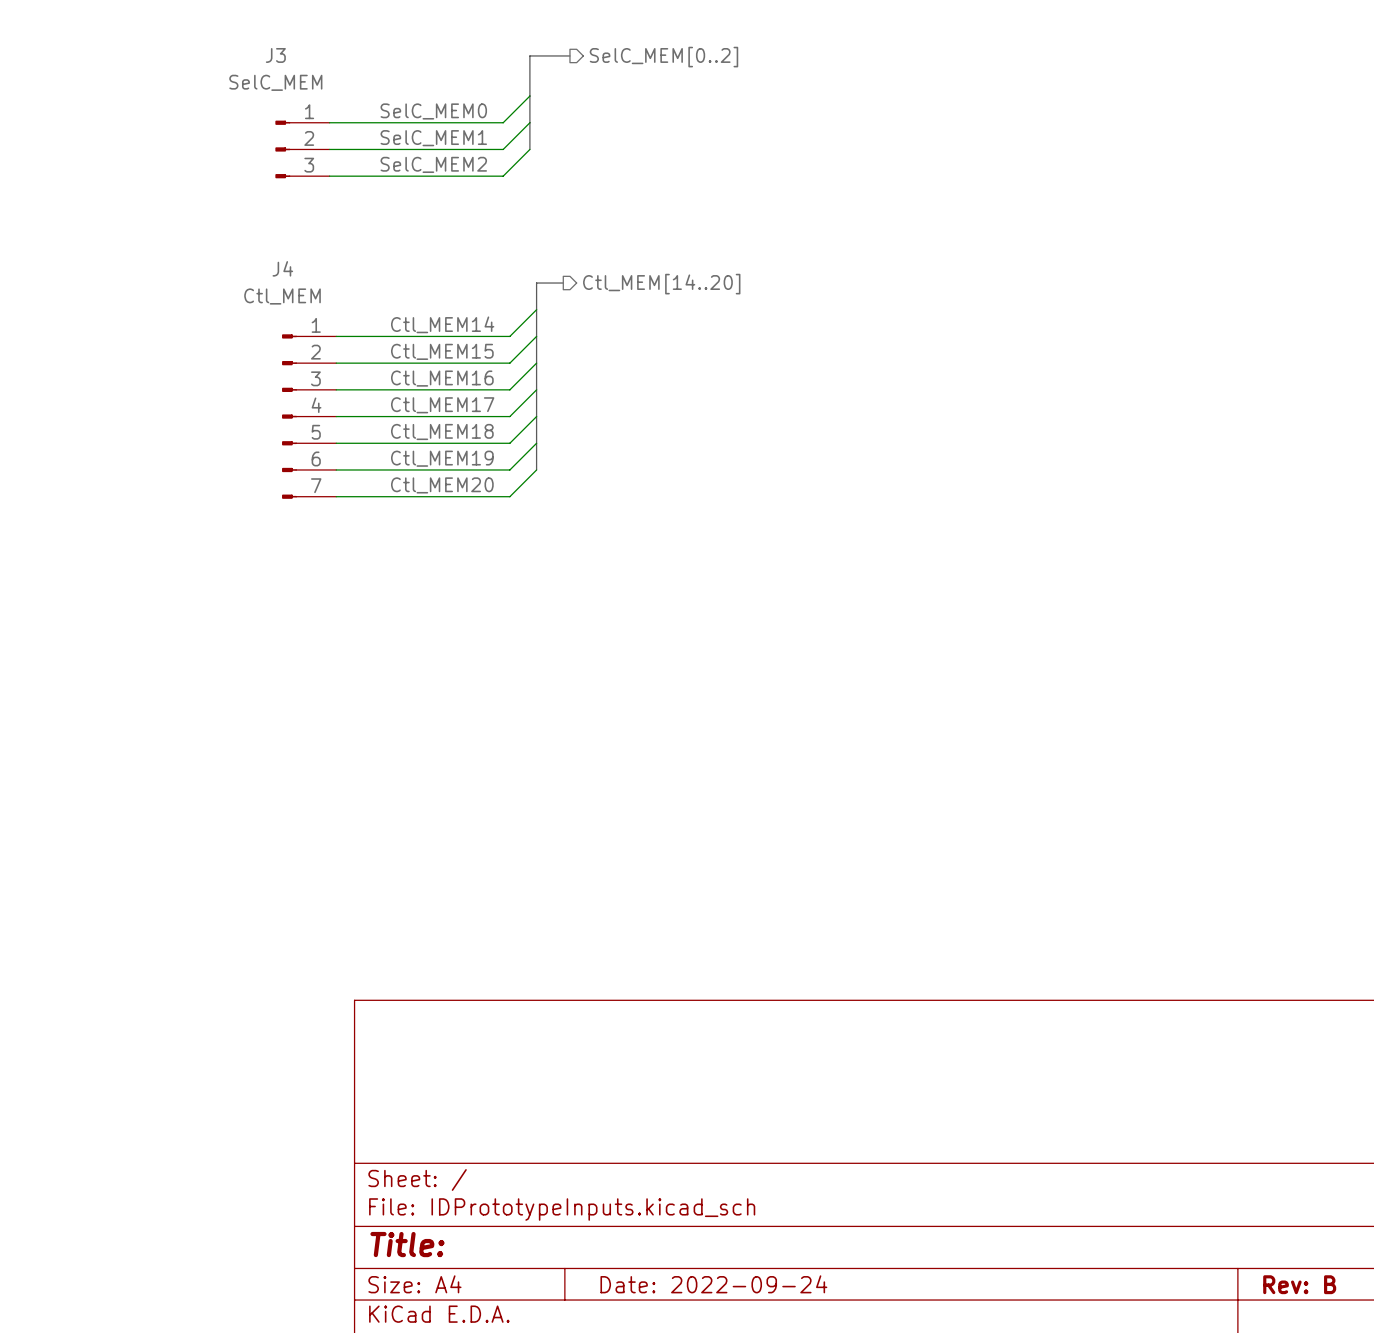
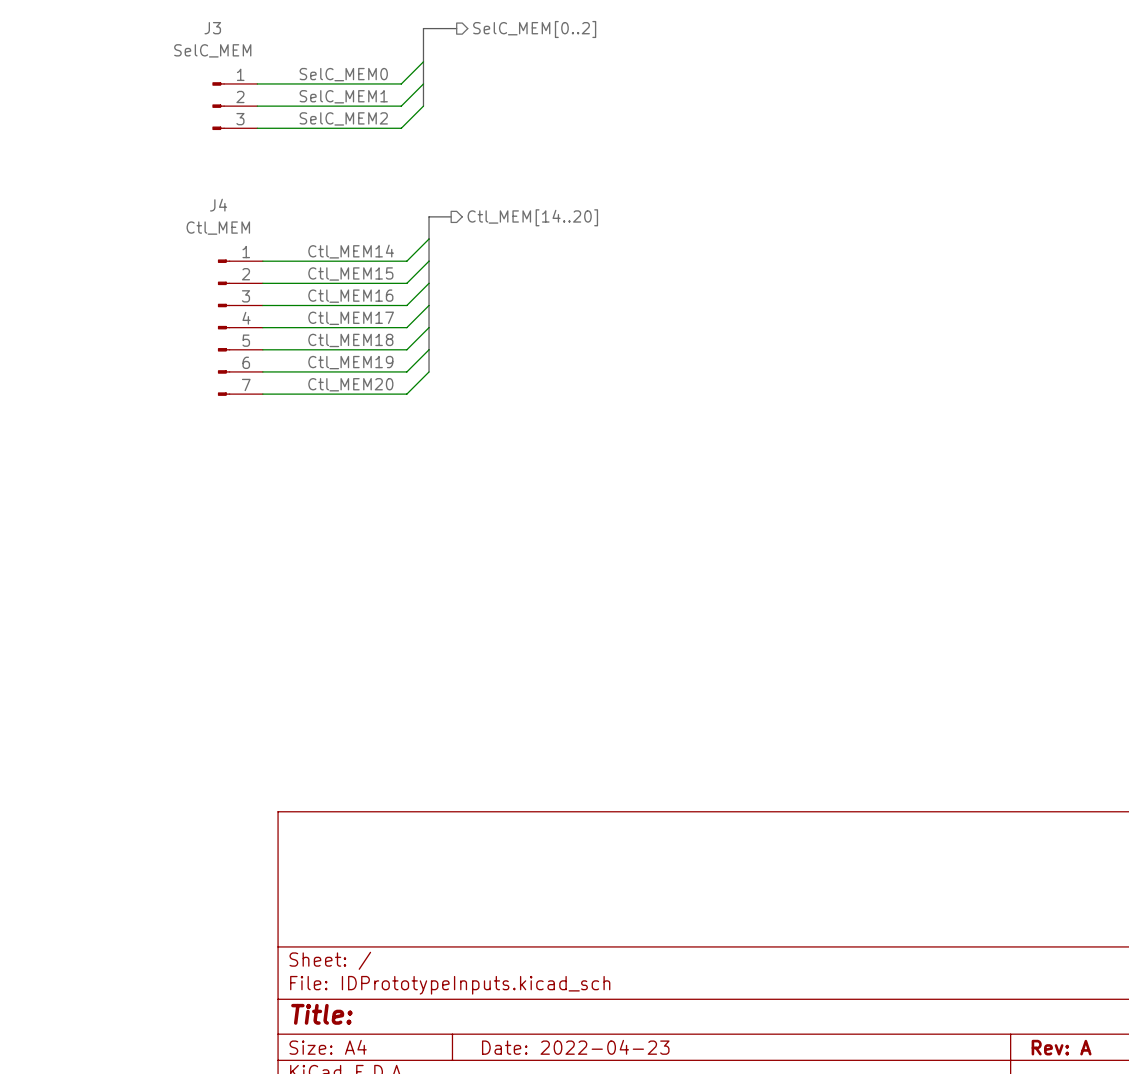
title block: Date: 2022-09-24 (713, 1284) -> Date: 2022-04-23 (575, 1047)
title block: Rev: B (1299, 1284) -> Rev: A (1061, 1047)

